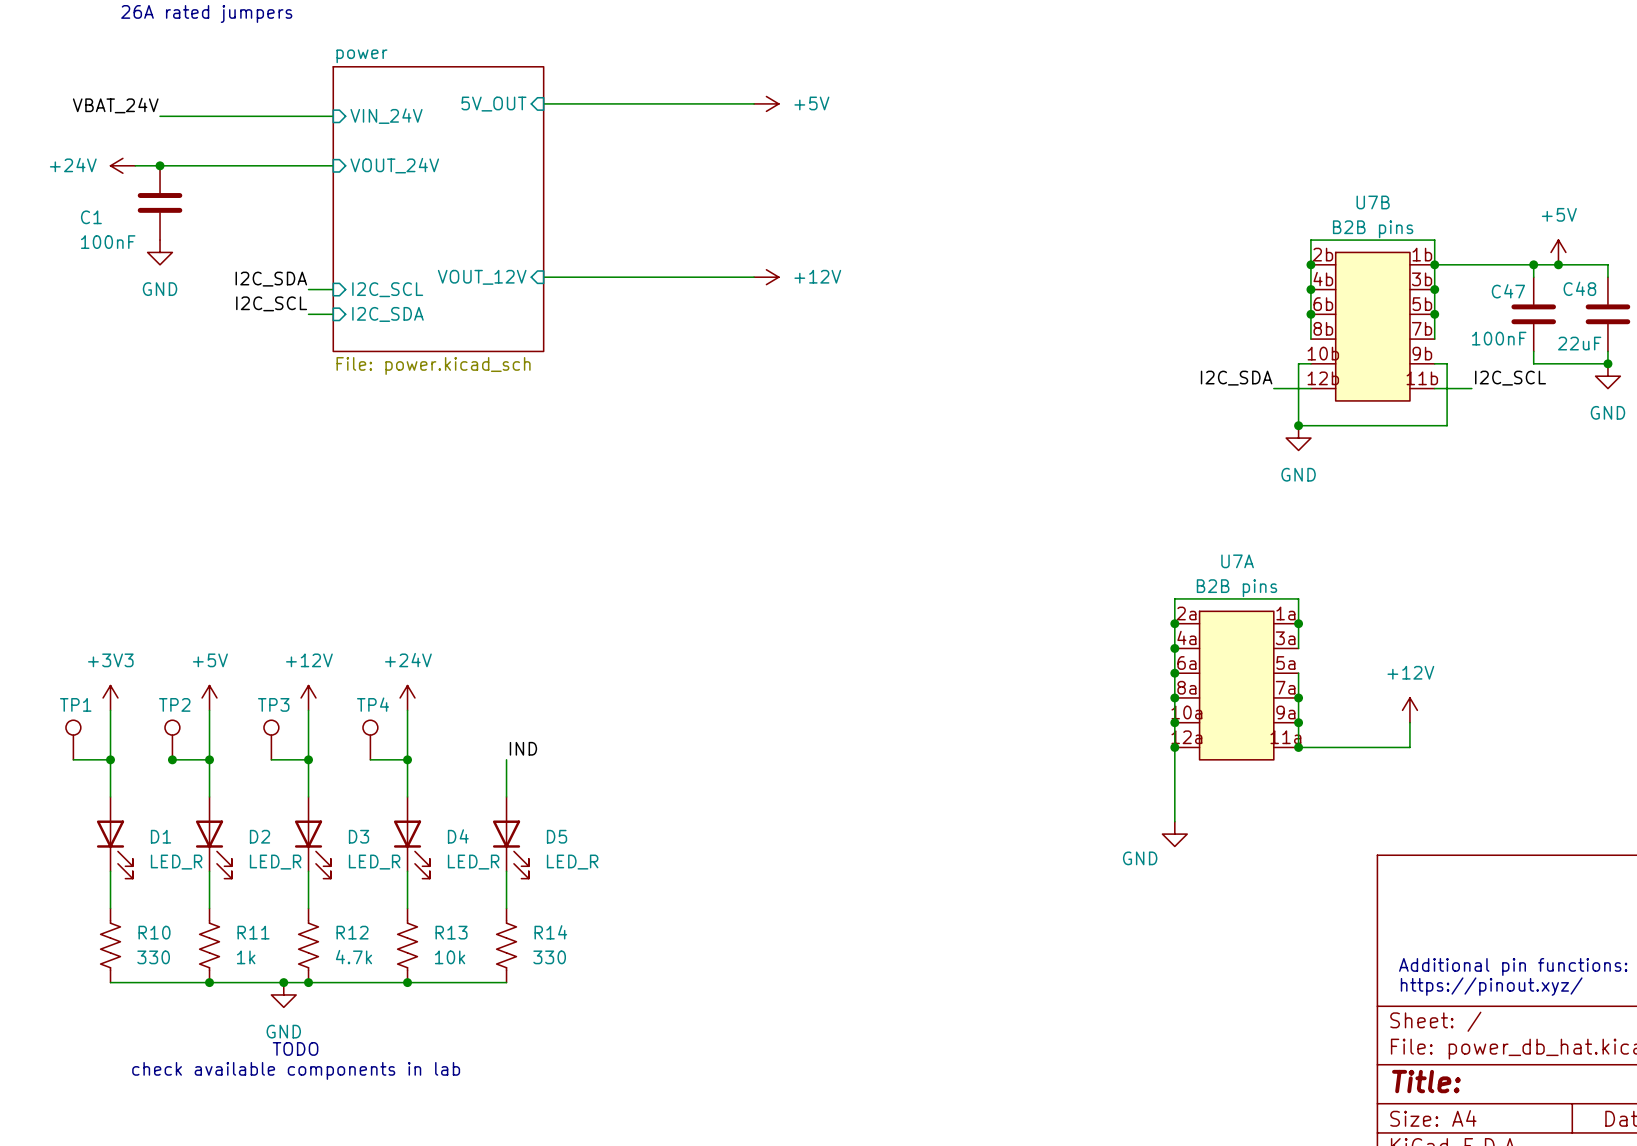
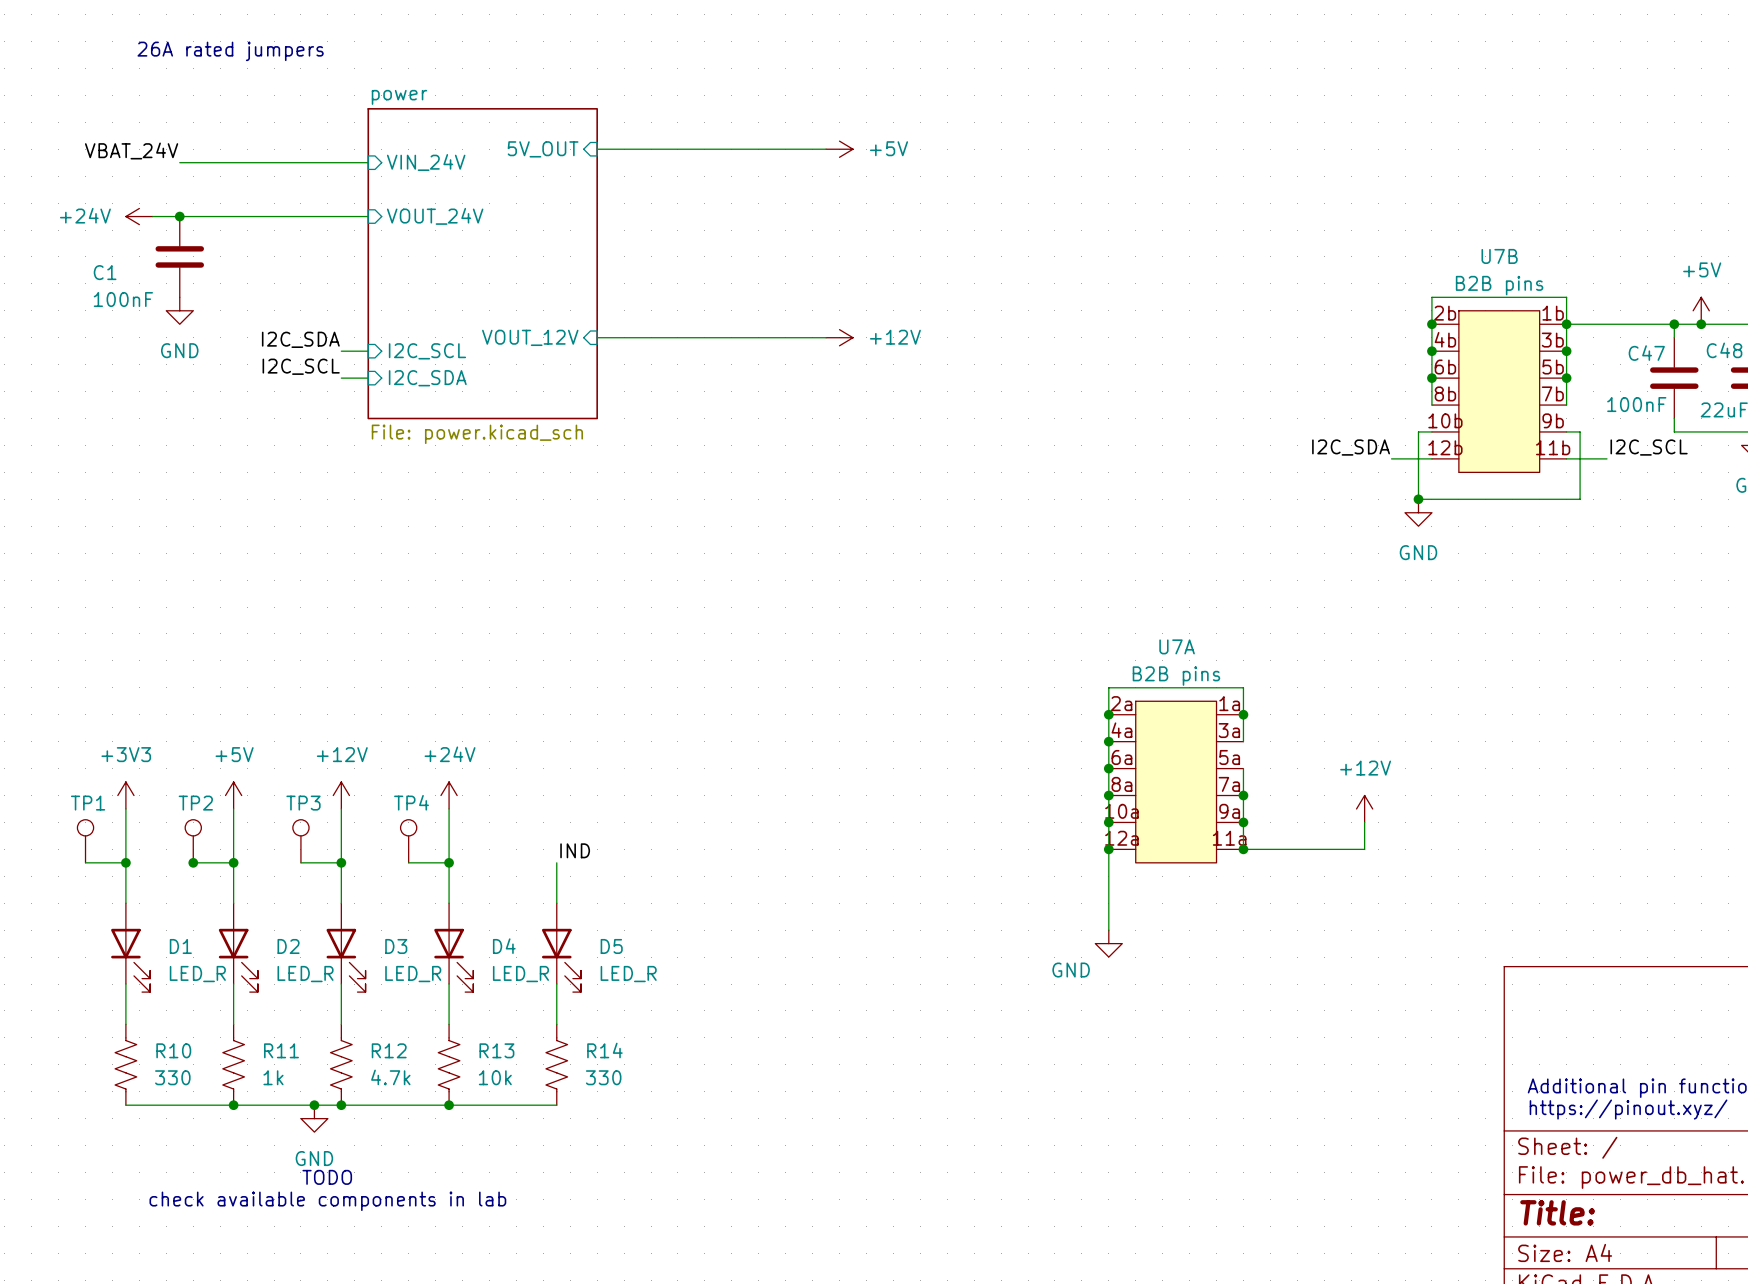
junction: none -> (1108, 714)
junction: none -> (1243, 714)
junction: (1174, 623) -> none
junction: (1298, 623) -> none
junction: none -> (1108, 741)
junction: (1174, 648) -> none
wire: (1298, 648) (1298, 598) (1174, 598) (1174, 821) -> (1243, 741) (1243, 687) (1108, 687) (1108, 930)
junction: none -> (1108, 768)
junction: (1174, 673) -> none
wire: (1298, 673) (1298, 747) (1409, 747) (1409, 722) -> (1243, 768) (1243, 849) (1364, 849) (1364, 822)
U7A position: (1236, 685) -> (1176, 782)
junction: none -> (1108, 795)
junction: none -> (1243, 795)
junction: (1174, 697) -> none
junction: (1298, 697) -> none
power symbol position: +12V (1409, 710) -> +12V (1364, 808)
junction: none -> (1108, 822)
junction: none -> (1243, 822)
junction: (1174, 722) -> none
junction: (1298, 722) -> none
junction: none -> (1108, 849)
junction: none -> (1243, 849)
junction: (1174, 747) -> none
junction: (1298, 747) -> none
power symbol position: GND (1174, 834) -> GND (1108, 943)

